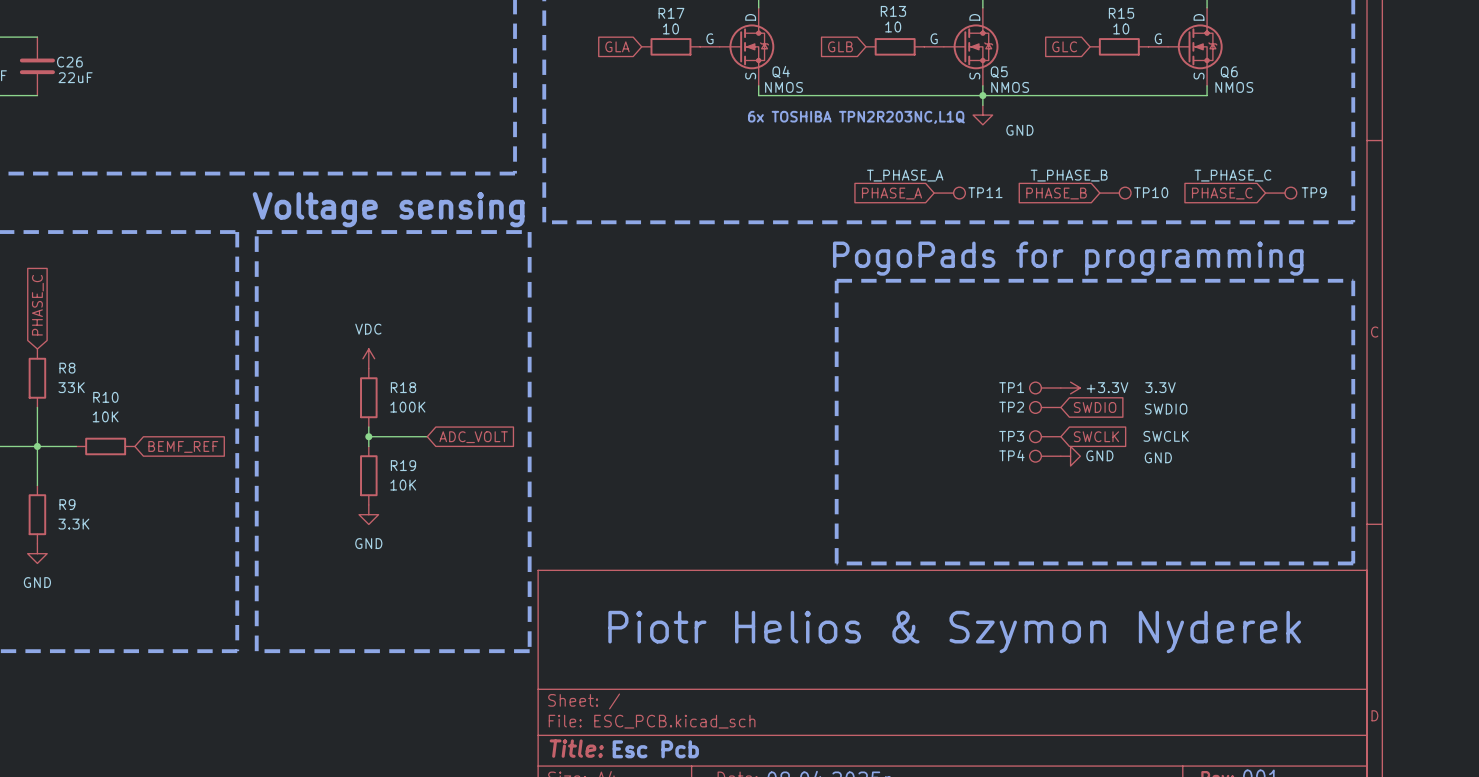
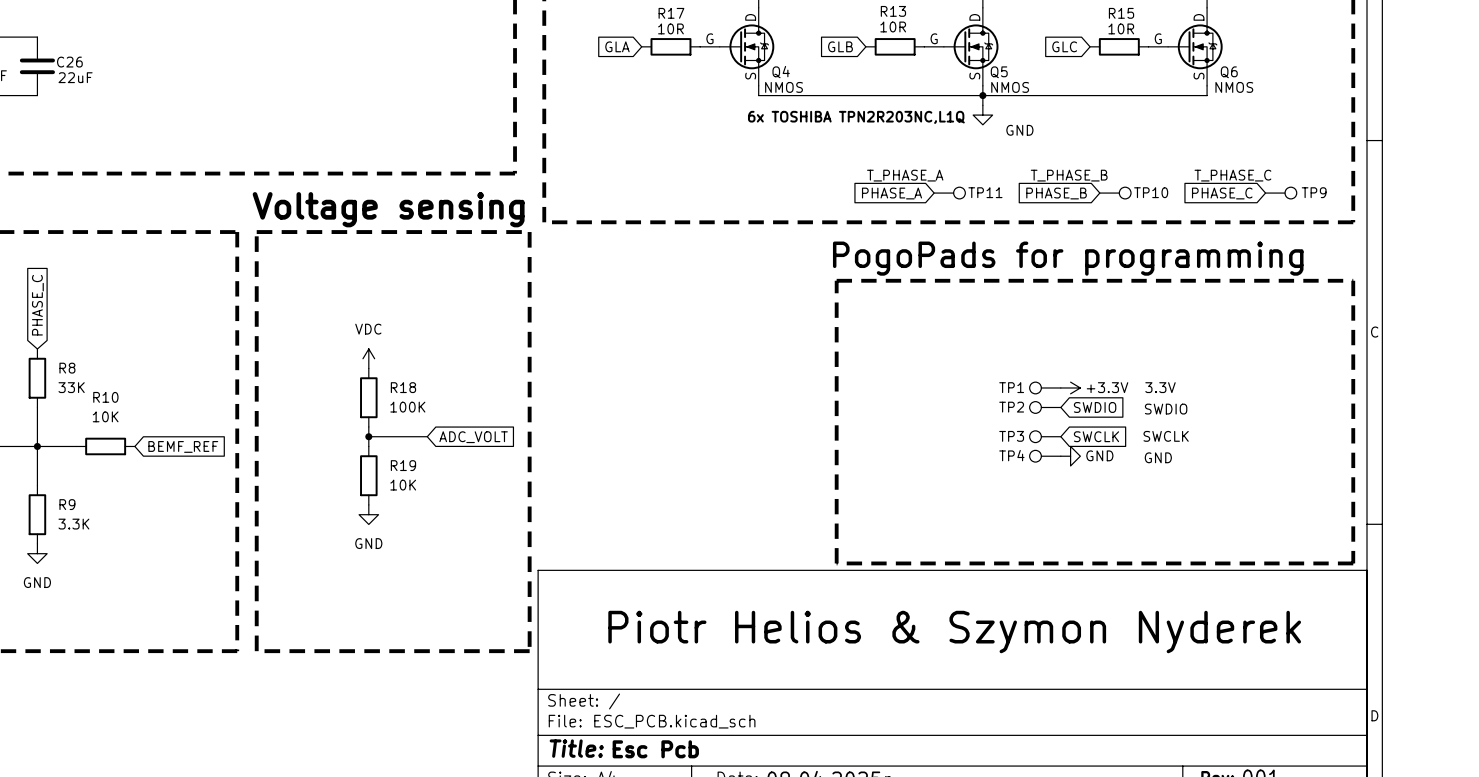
R13 value: 10 (893, 26) -> 10R (893, 26)
R17 value: 10 (670, 28) -> 10R (670, 28)
R15 value: 10 (1121, 28) -> 10R (1121, 28)

